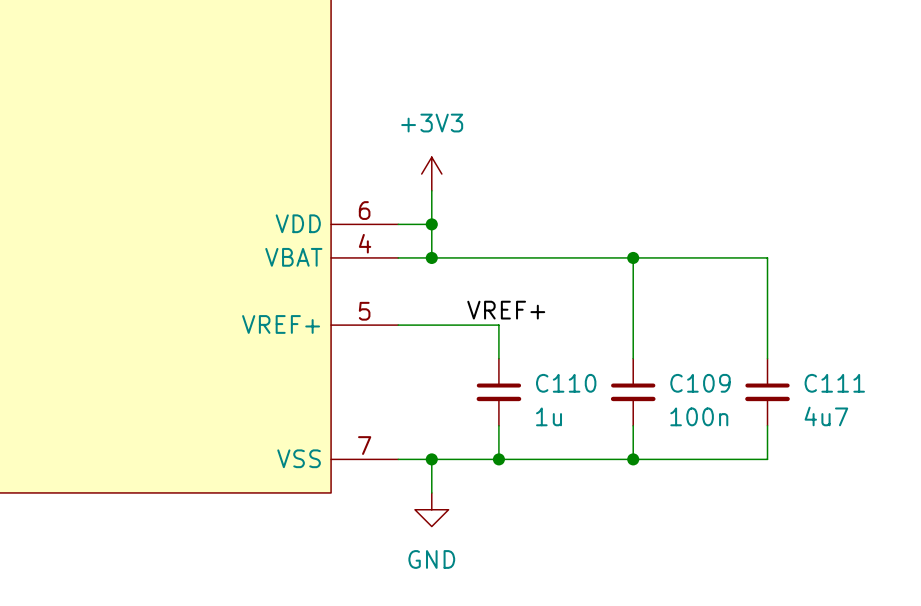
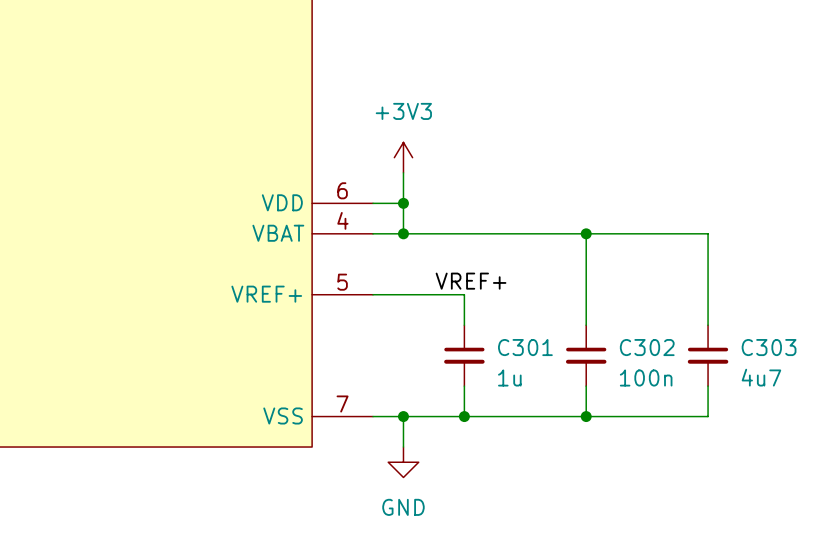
C110 name: C110 (566, 383) -> C301 (525, 347)
C109 name: C109 (700, 383) -> C302 (647, 347)
C111 name: C111 (834, 383) -> C303 (769, 347)

